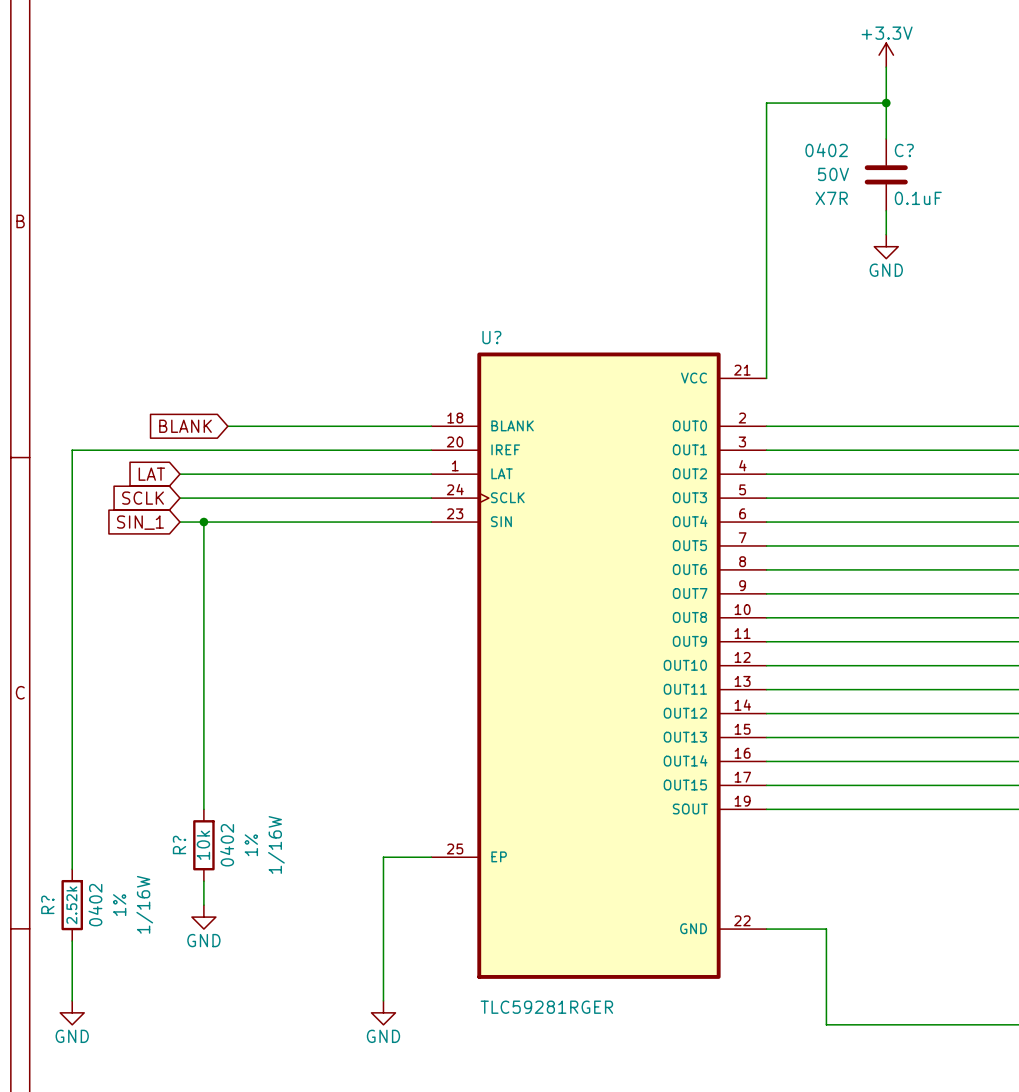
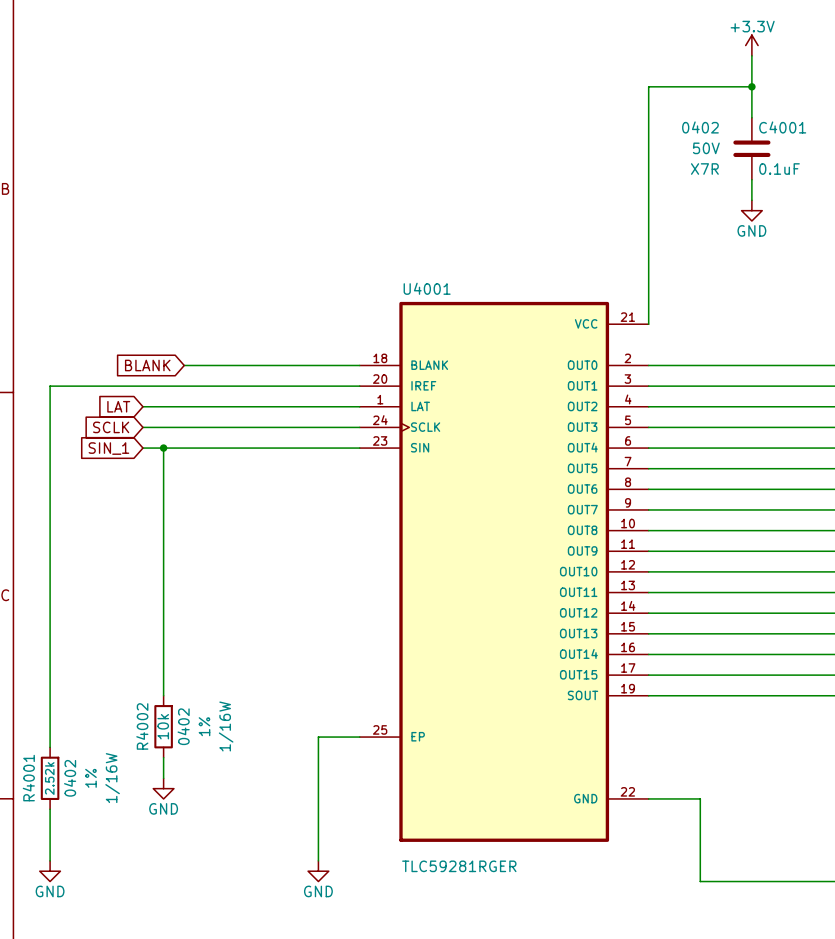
C? name: C? (904, 150) -> C4001 (782, 127)
U? name: U? (491, 337) -> U4001 (427, 288)
R? name: R? (179, 844) -> R4002 (142, 726)
R? name: R? (47, 904) -> R4001 (28, 778)

